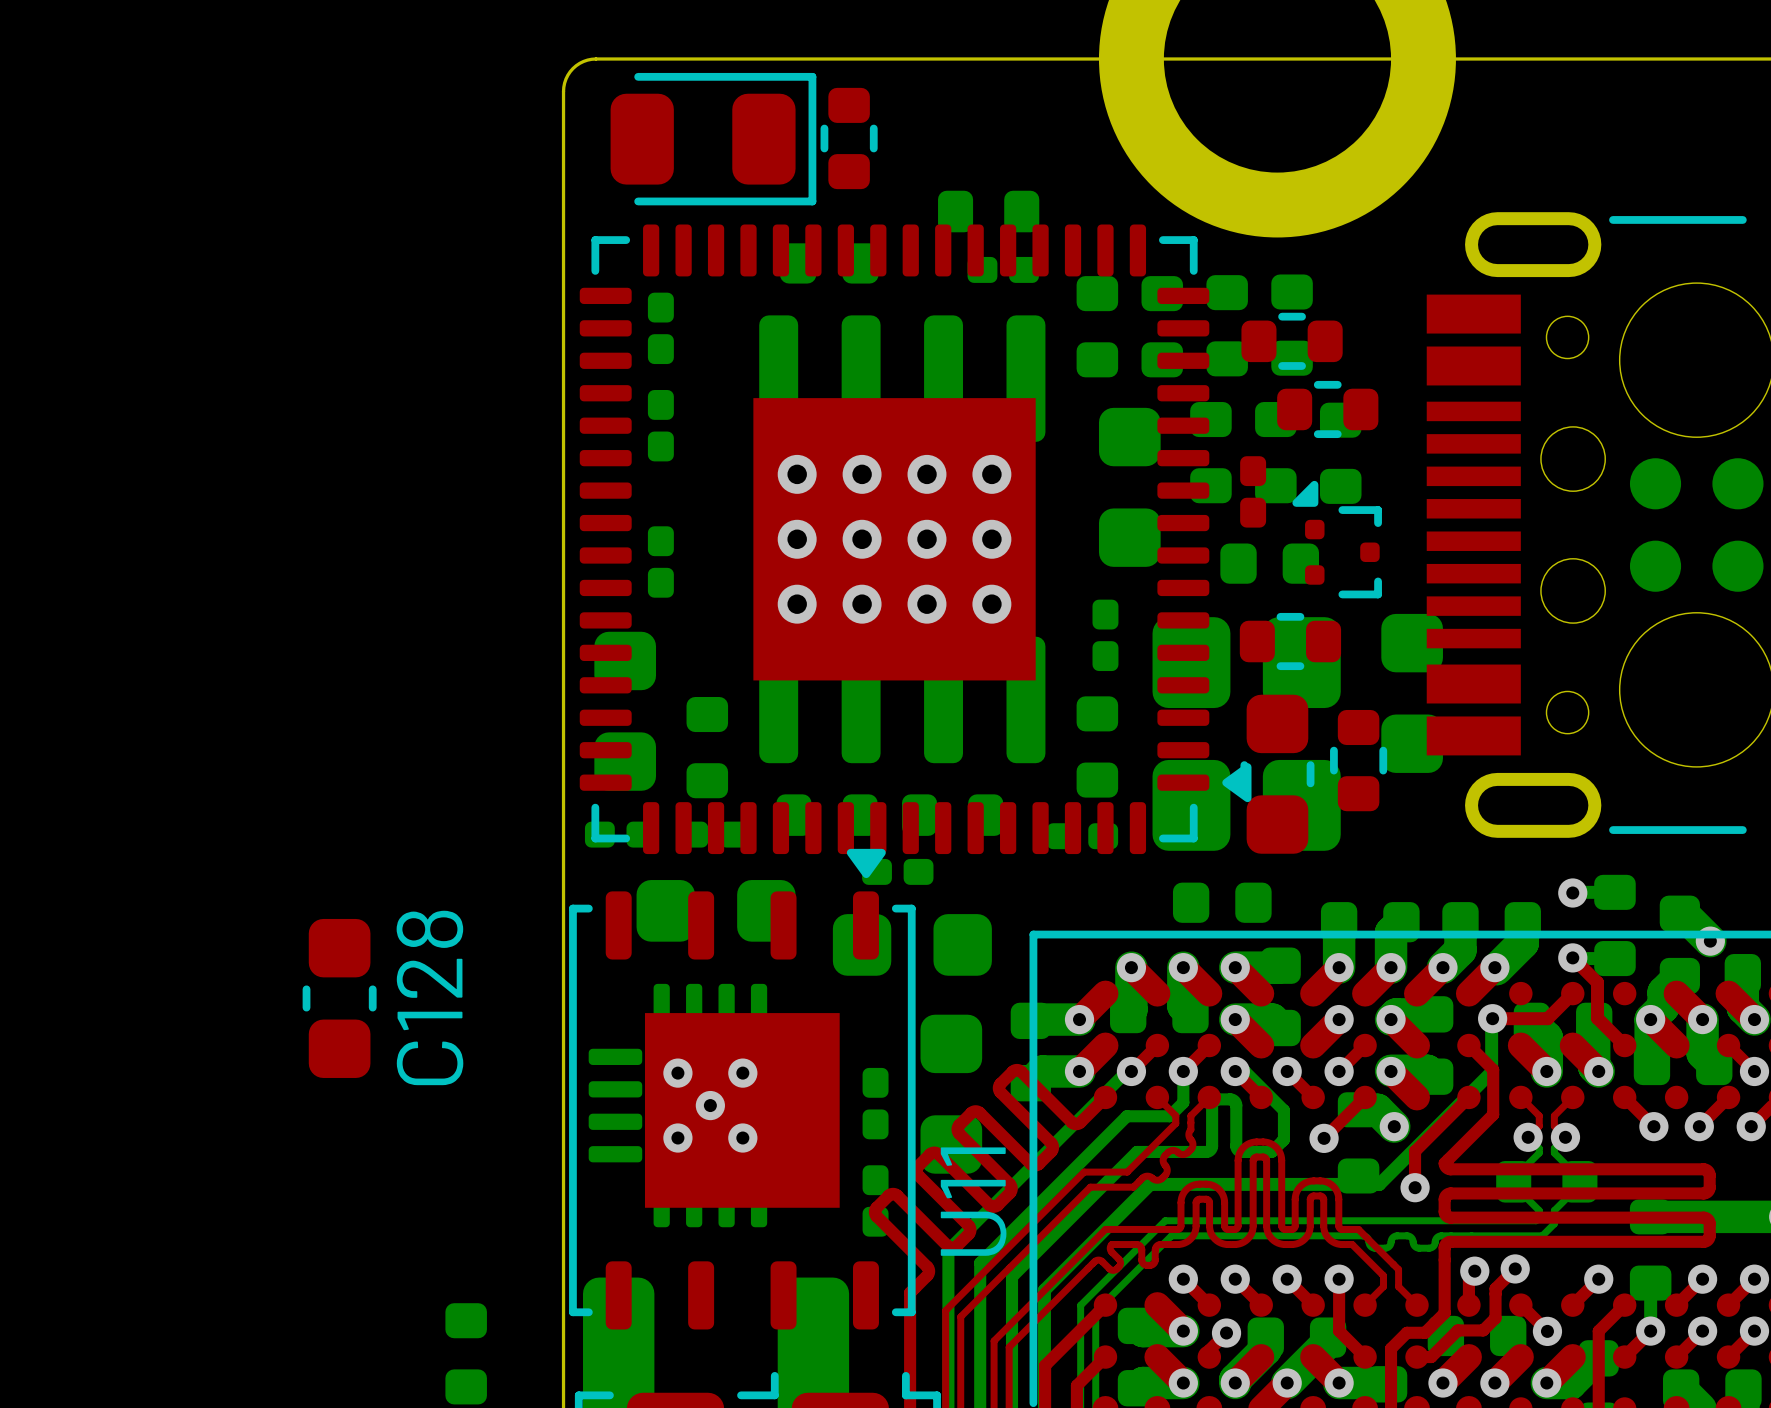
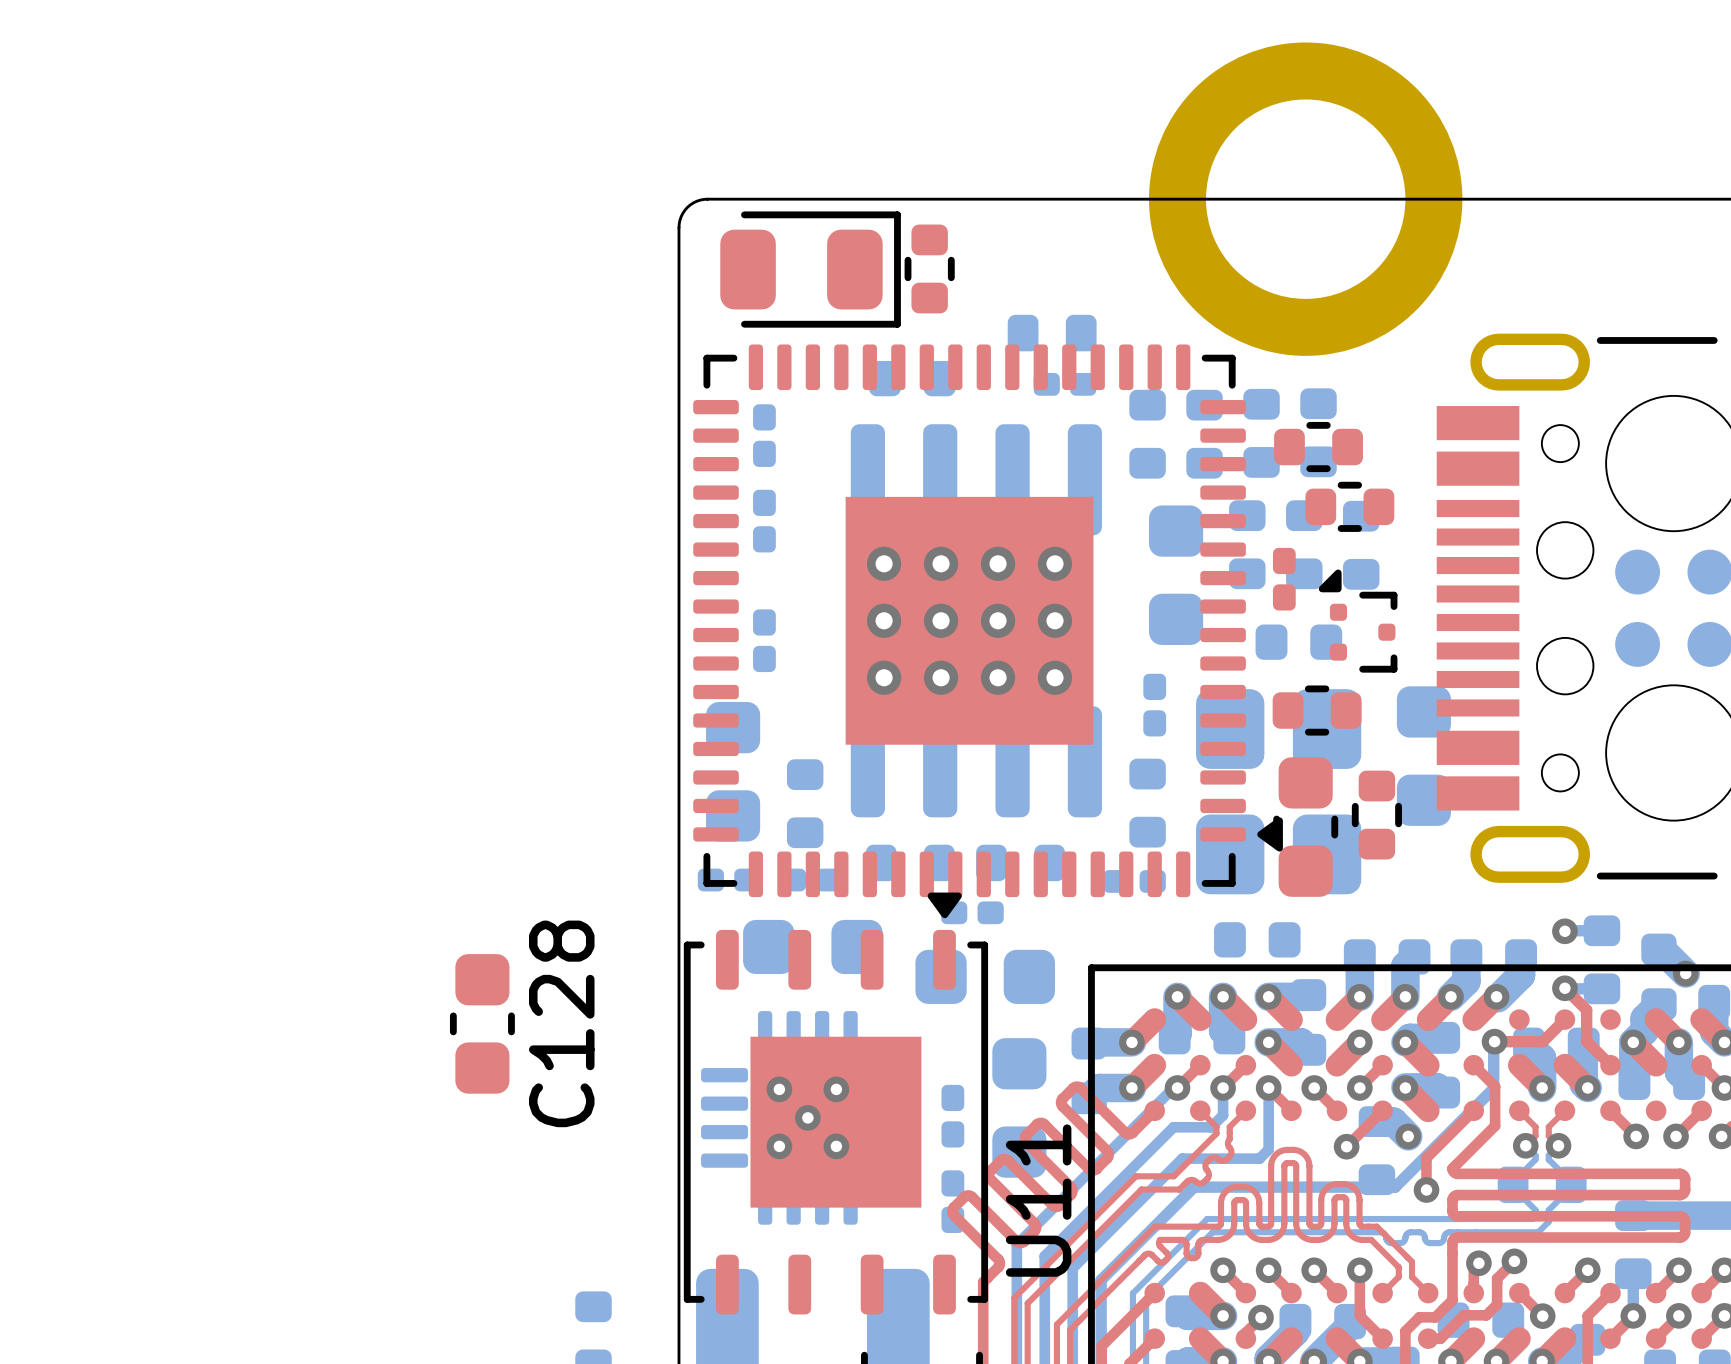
bottom track: (1235, 1071) (1245, 1071) (1283, 1110) (1283, 1139) (1271, 1151) (1239, 1151) (1236, 1146) (1235, 1102) (1231, 1099) (1217, 1099) (1212, 1104) (1211, 1147) (1206, 1151) -> (1268, 1087) (1268, 1149) (1259, 1158) (1243, 1158)

